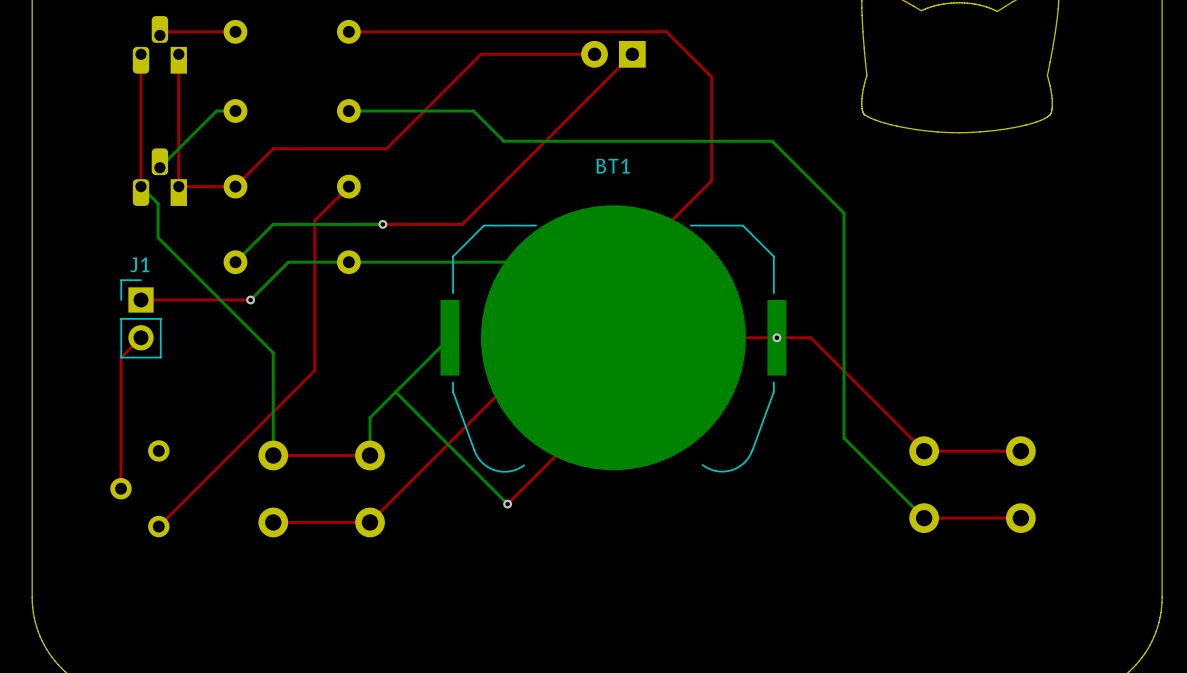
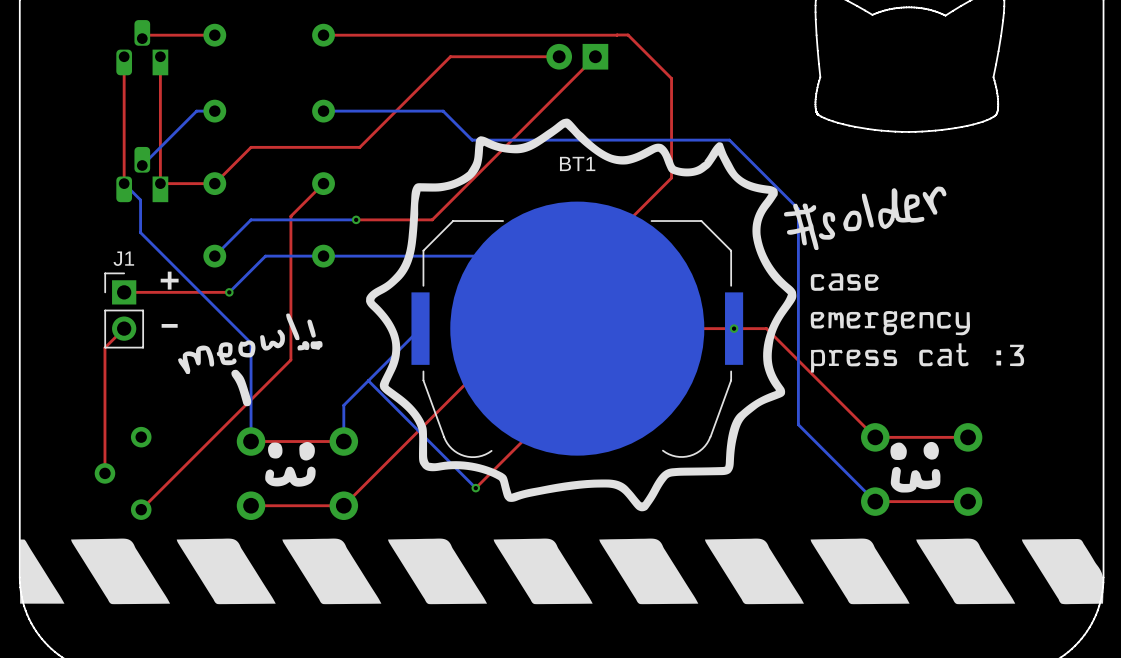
drawing: none -> [366, 118, 971, 512]
drawing: none -> [160, 271, 179, 290]
drawing: none -> [178, 313, 323, 407]
drawing: none -> [161, 323, 178, 328]
drawing: none -> [996, 344, 1025, 367]
drawing: none -> [890, 441, 941, 493]
drawing: none -> [265, 442, 316, 487]
drawing: none -> [20, 538, 1104, 605]

